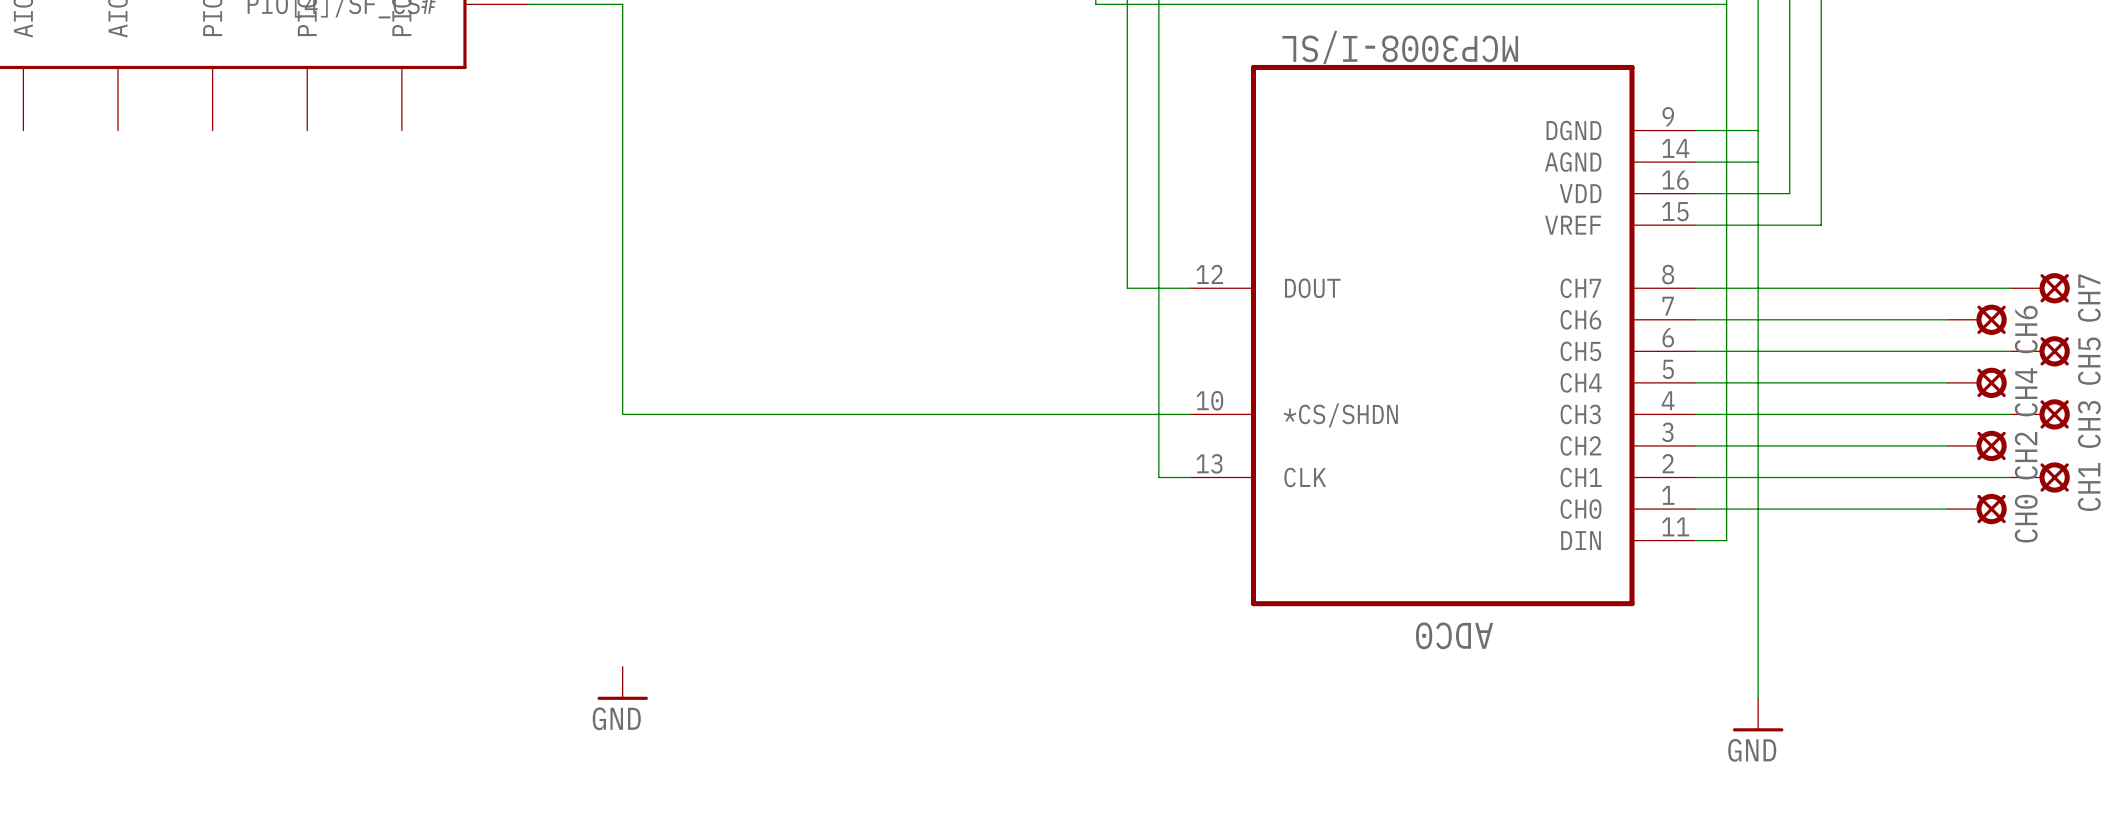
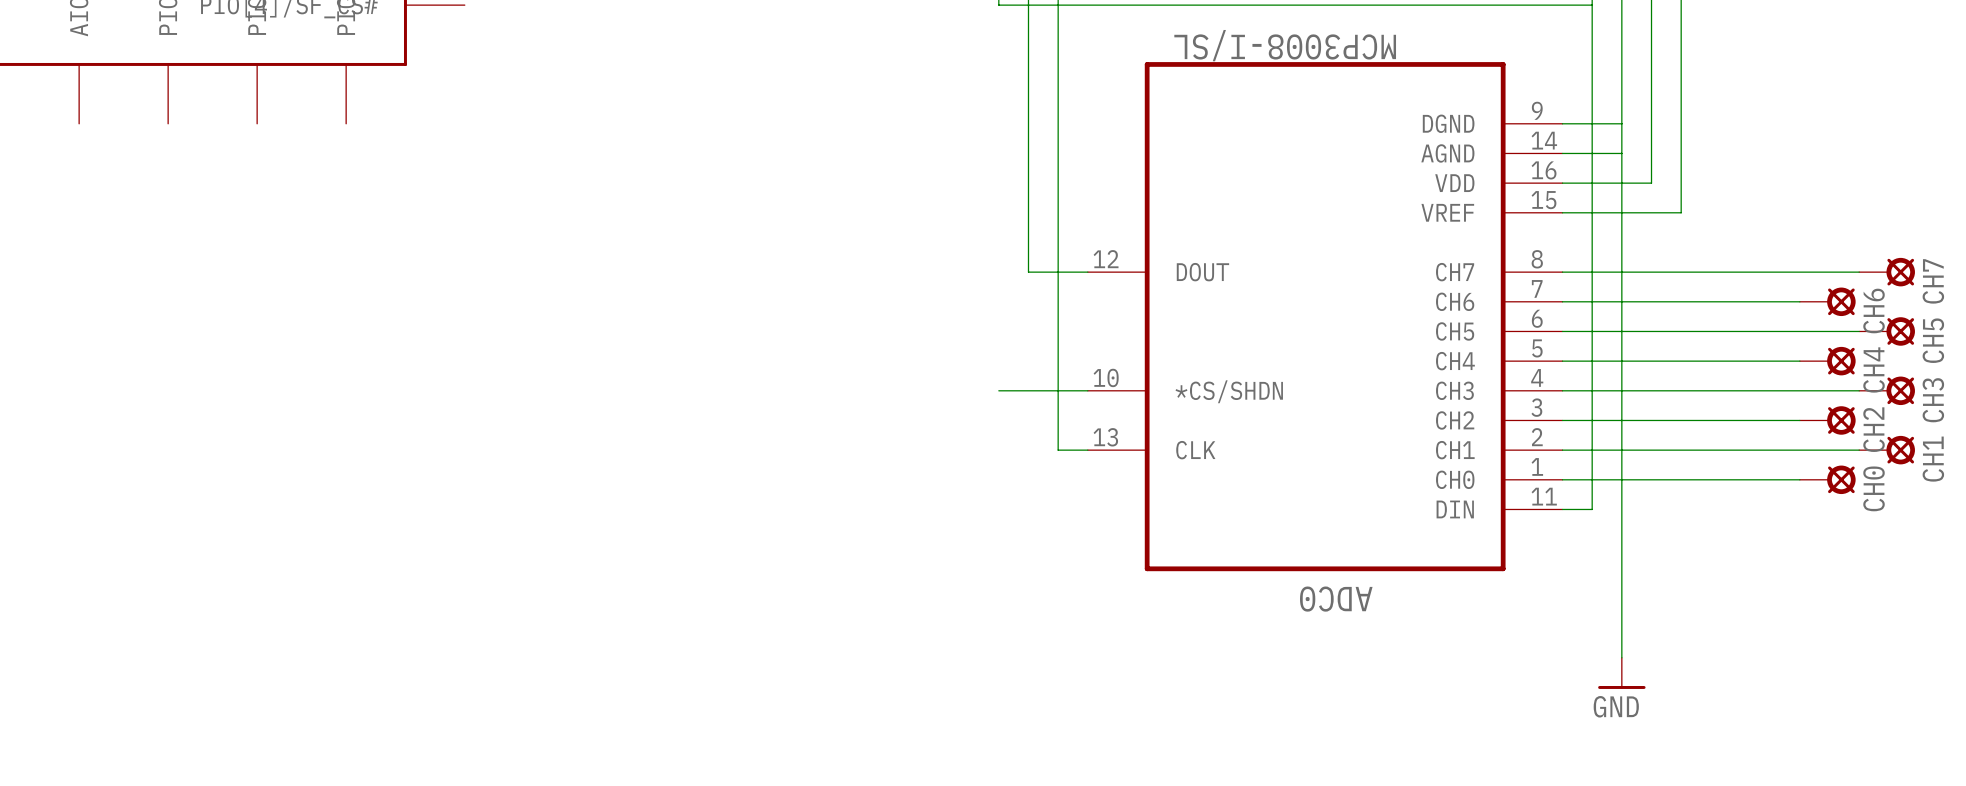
wire: (528, 4) (622, 4) (622, 414) (1095, 414) -> none
power symbol: GND (622, 683) -> none

